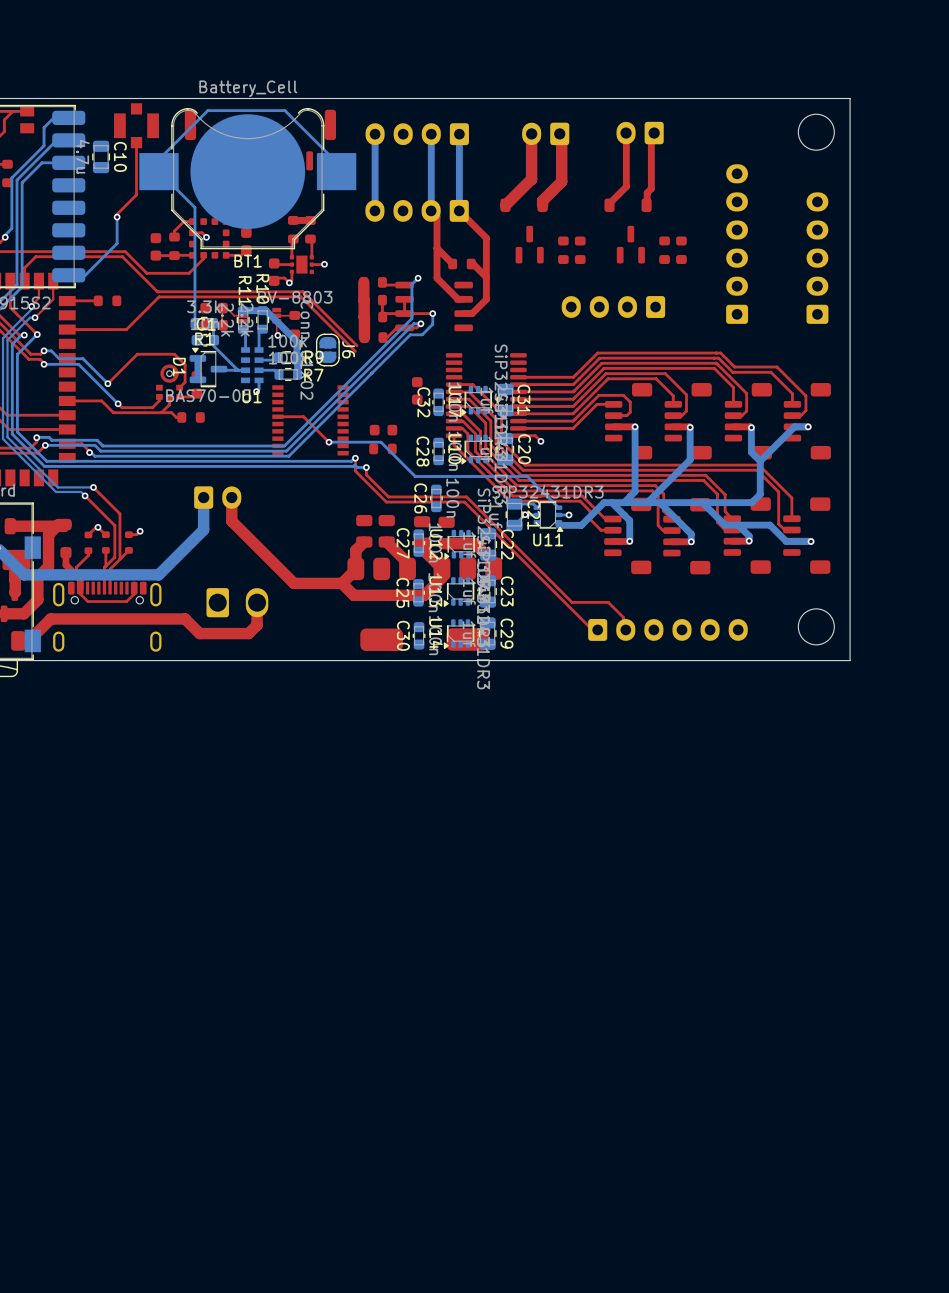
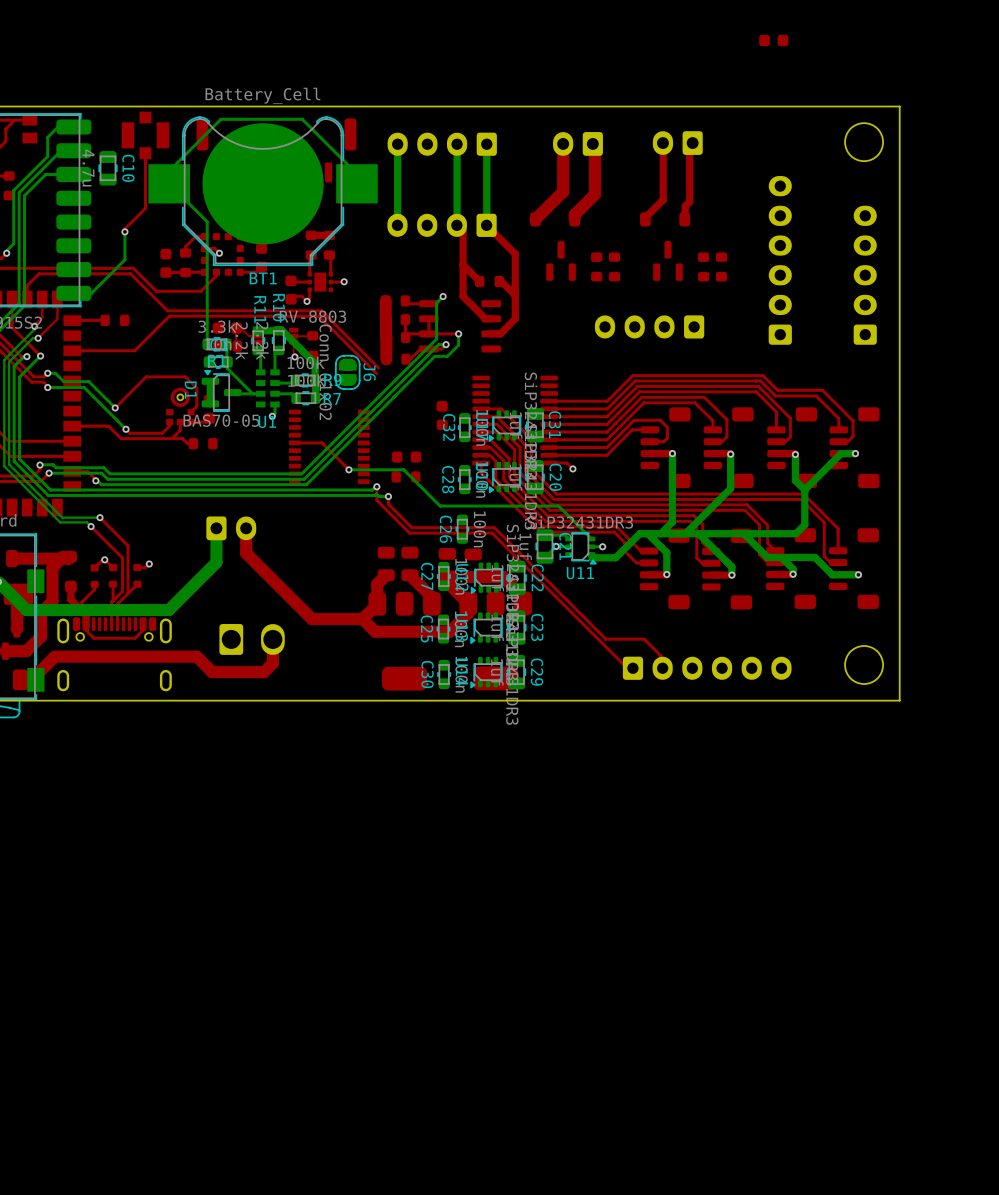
part: none -> (773, 40)

